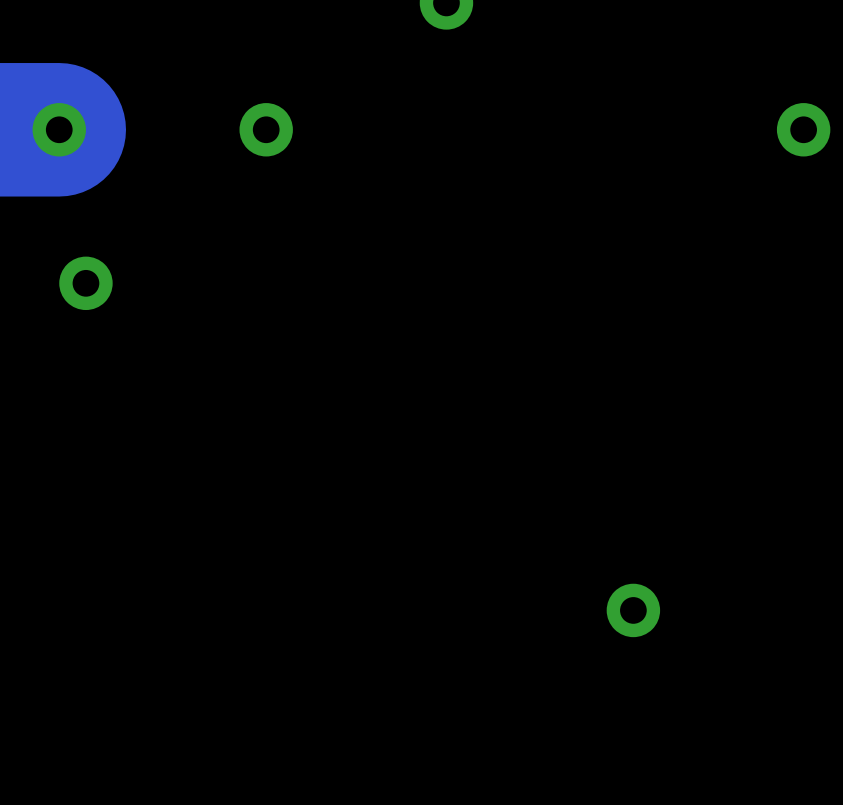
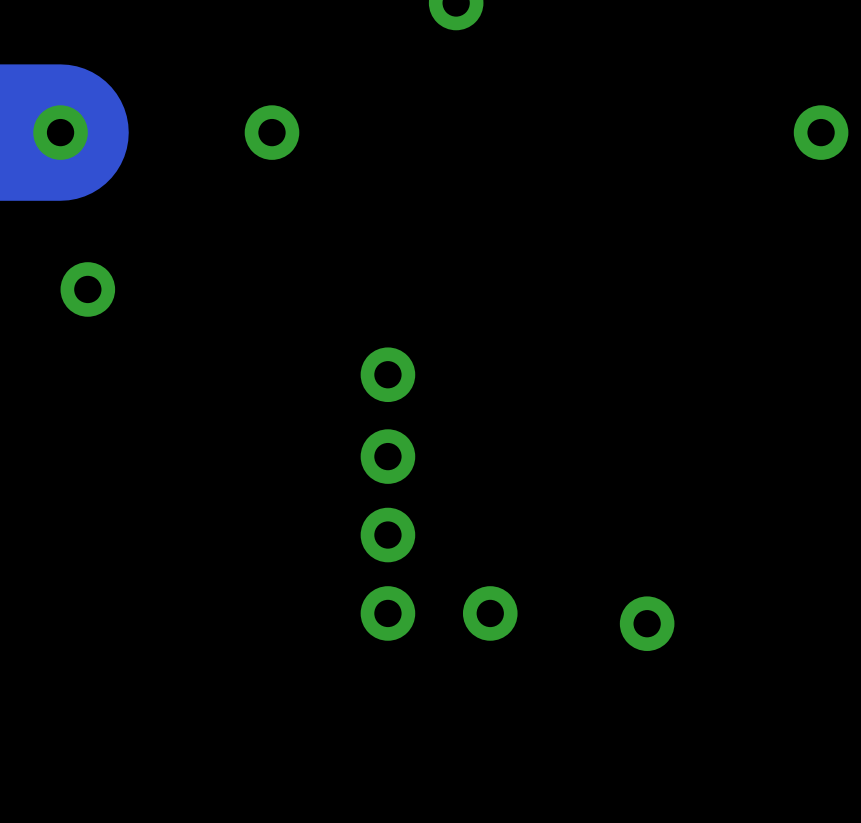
via: none -> (387, 374)
via: none -> (387, 456)
via: none -> (387, 535)
via: none -> (387, 613)
via: none -> (490, 613)

